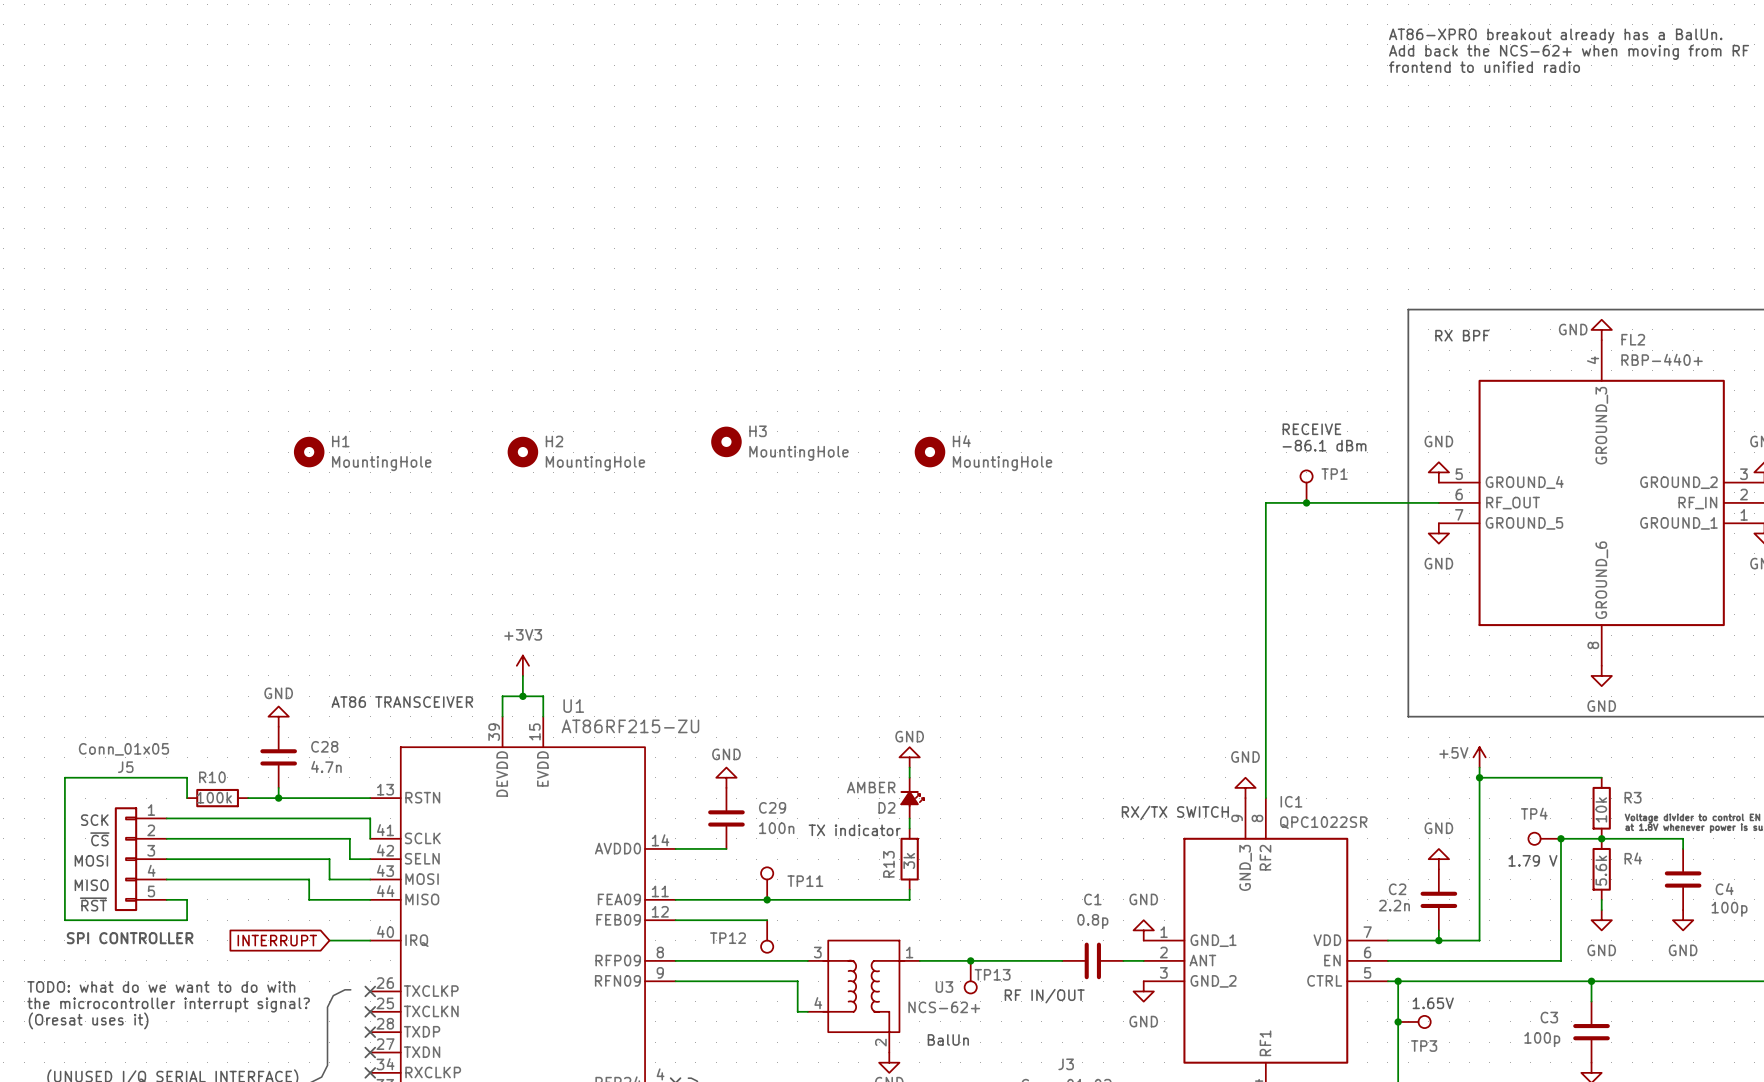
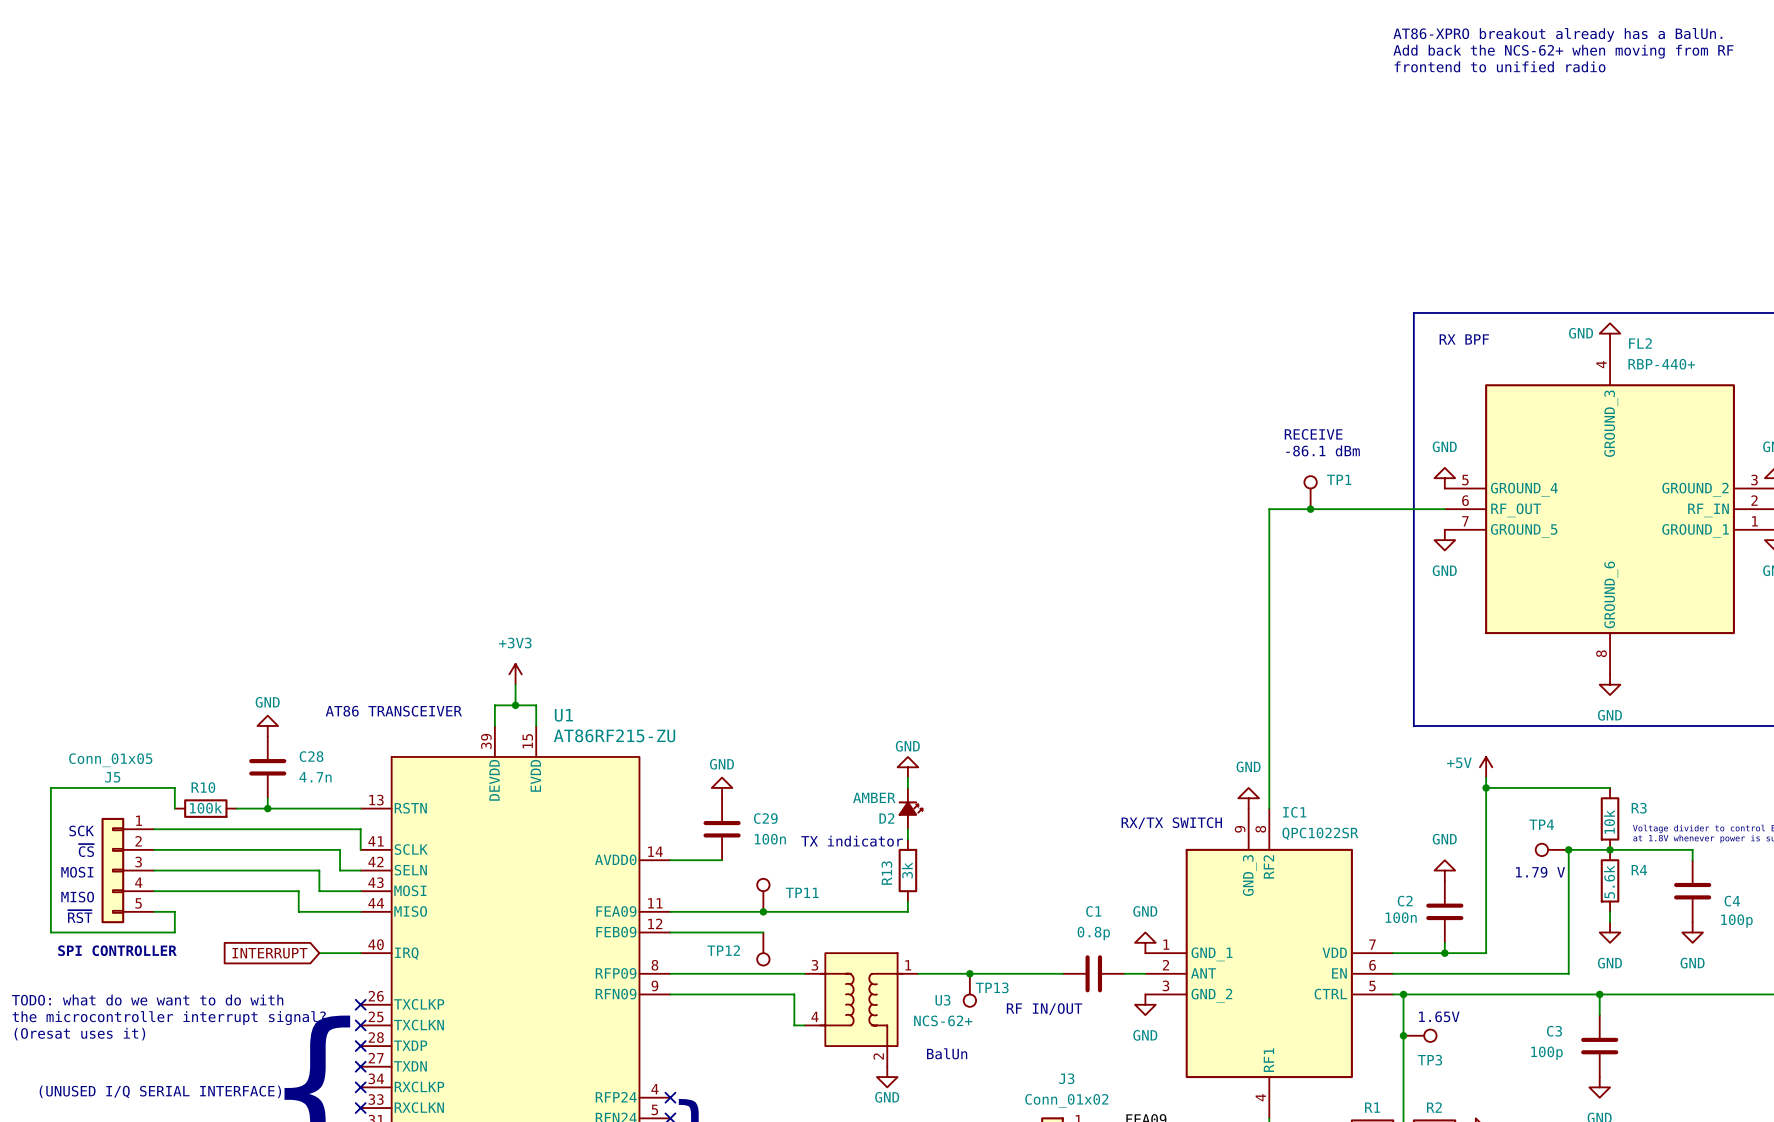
H3: MountingHole (726, 441) -> none
H1: MountingHole (309, 452) -> none
H2: MountingHole (522, 452) -> none
H4: MountingHole (930, 452) -> none
C2 value: 2.2n (1394, 905) -> 100n (1401, 917)

